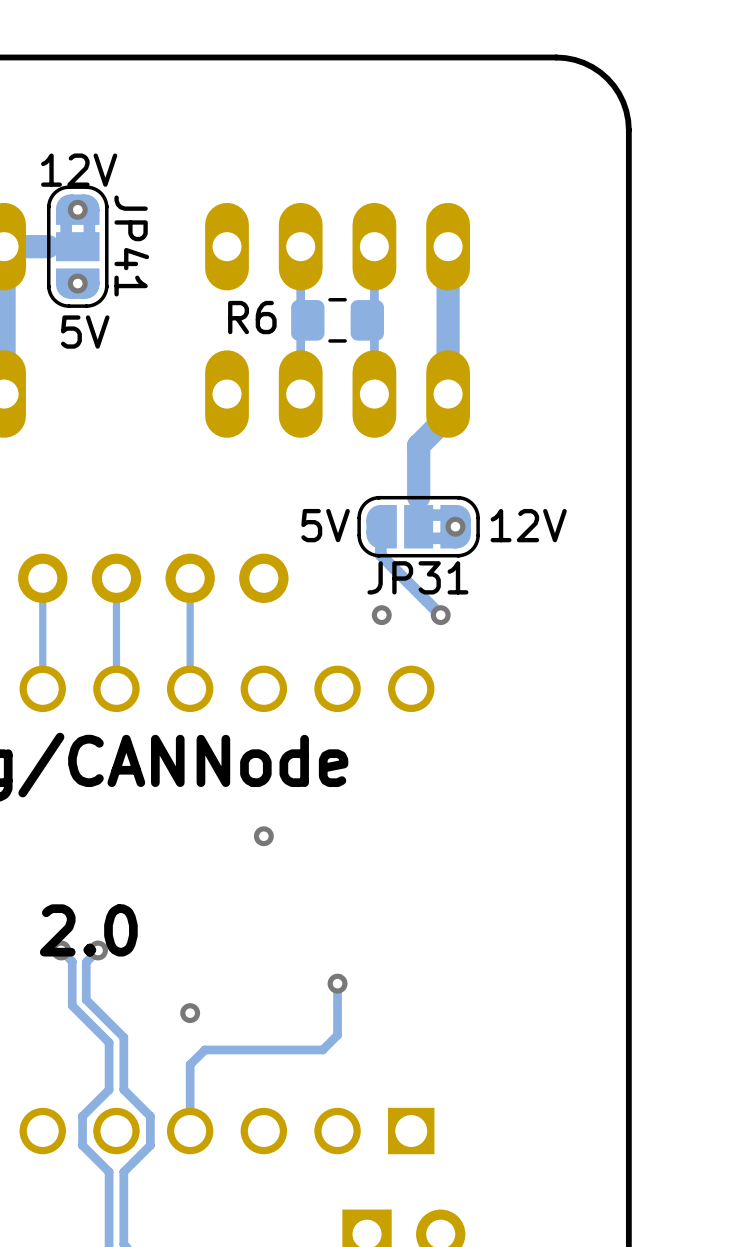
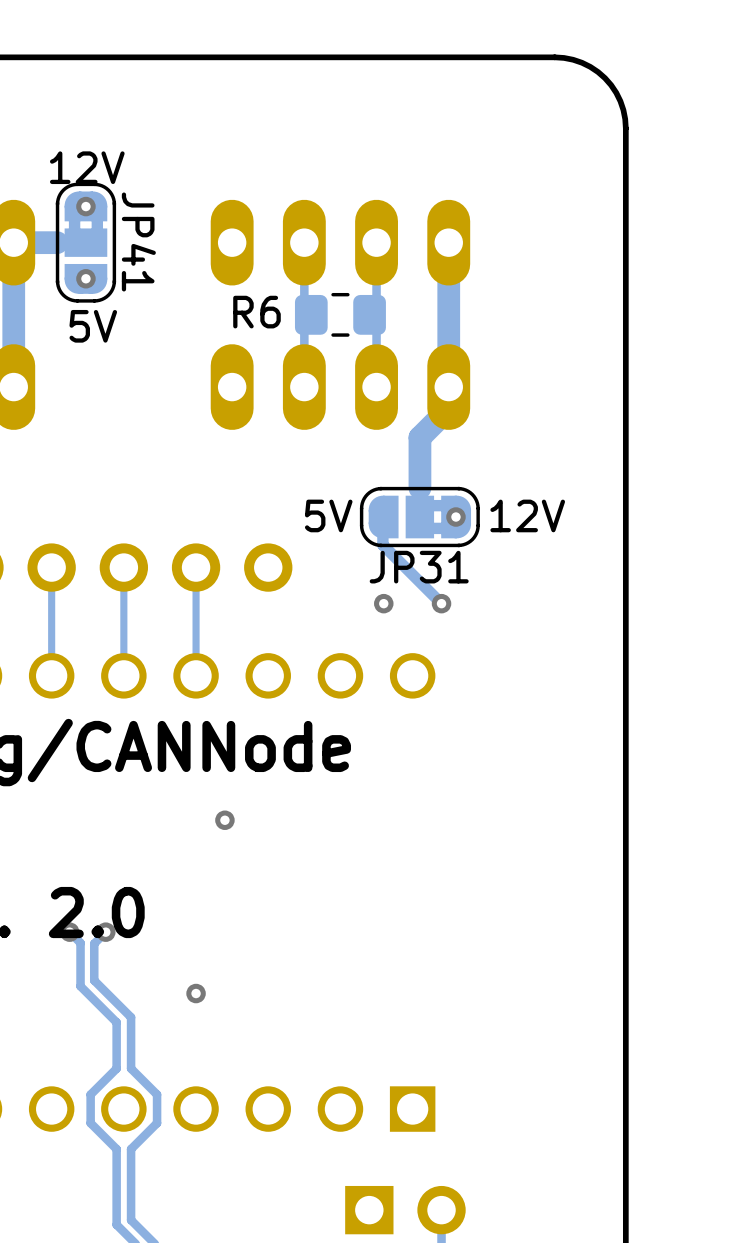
via position: (263, 836) -> (224, 820)
track: (337, 983) (337, 1035) (322, 1049) (204, 1049) (190, 1064) (190, 1131) -> none
via: (337, 983) -> none

